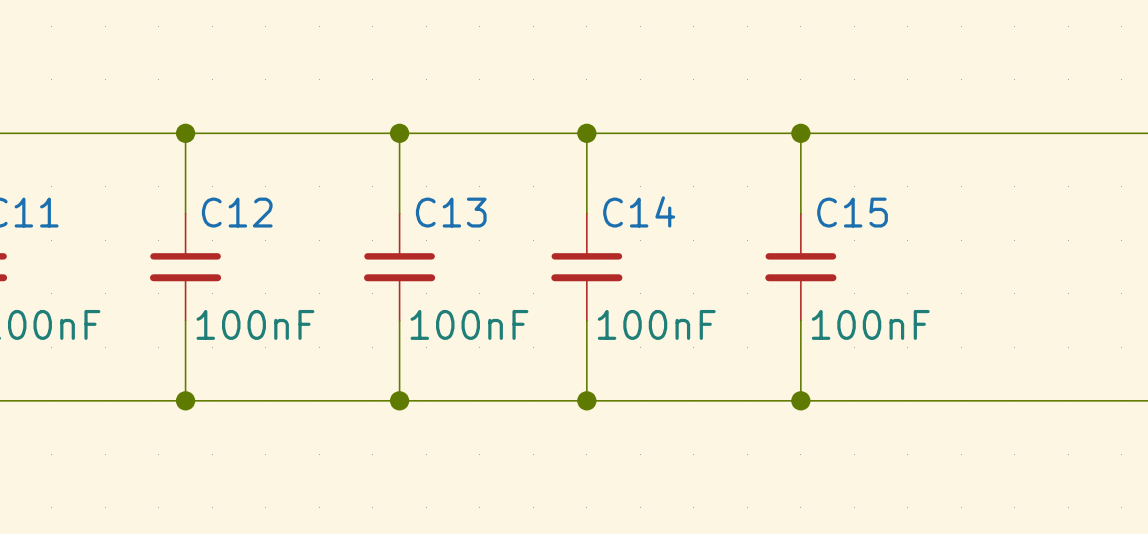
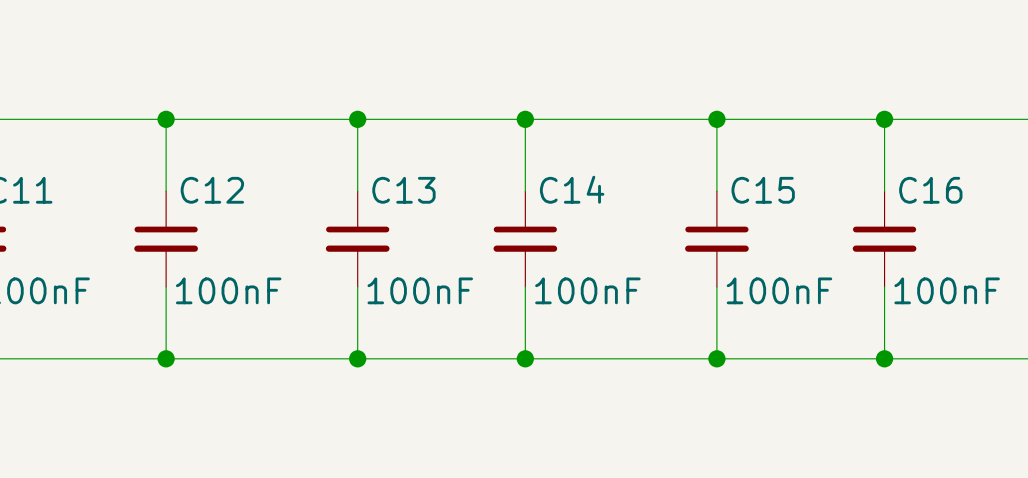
wire: none -> (884, 119) (884, 191)
junction: none -> (884, 119)
C16: none -> 100nF (884, 239)
wire: none -> (884, 286) (884, 358)
junction: none -> (884, 358)

